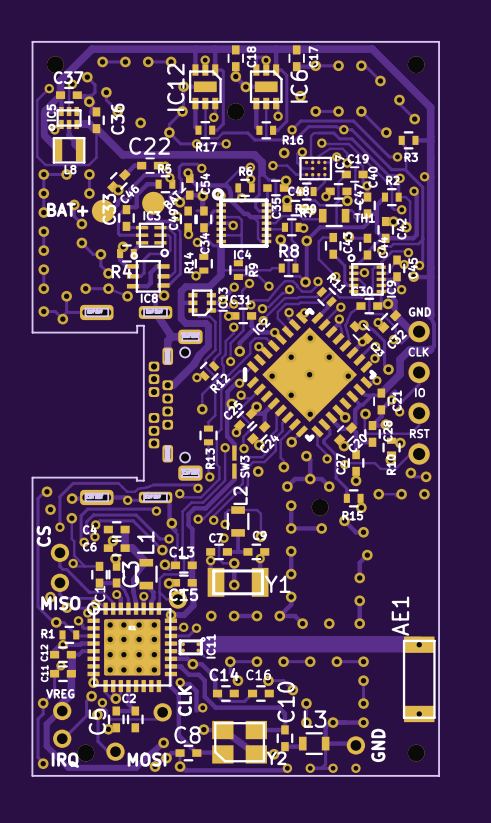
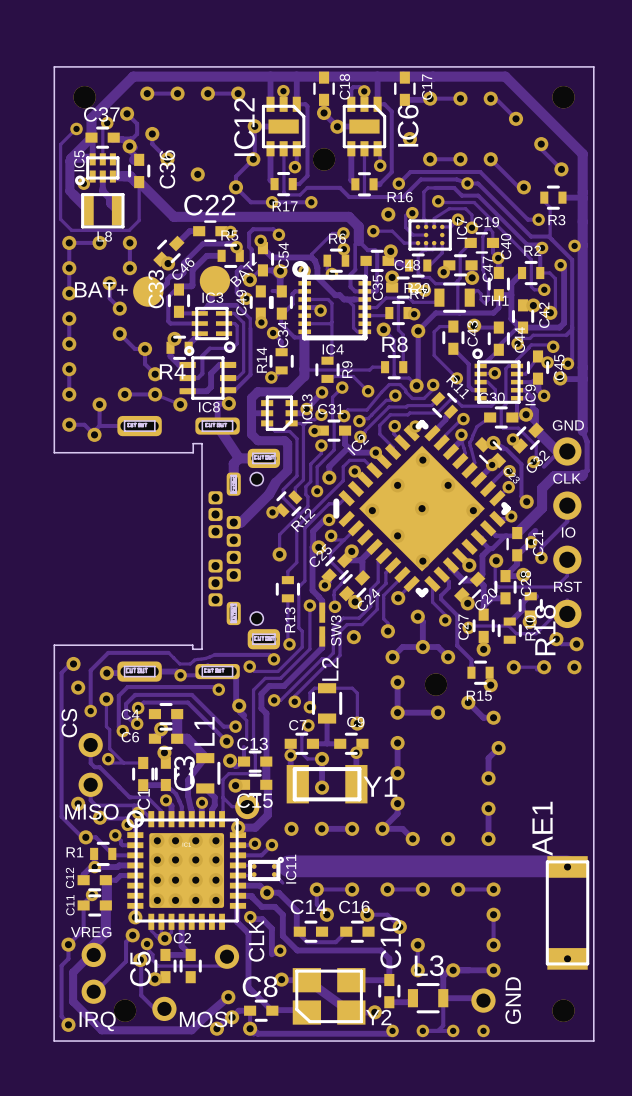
track: none -> (536, 596) (528, 596) (522, 602) (522, 609) (509, 621)
via: (400, 443) -> none
R18: none -> (509, 630)

